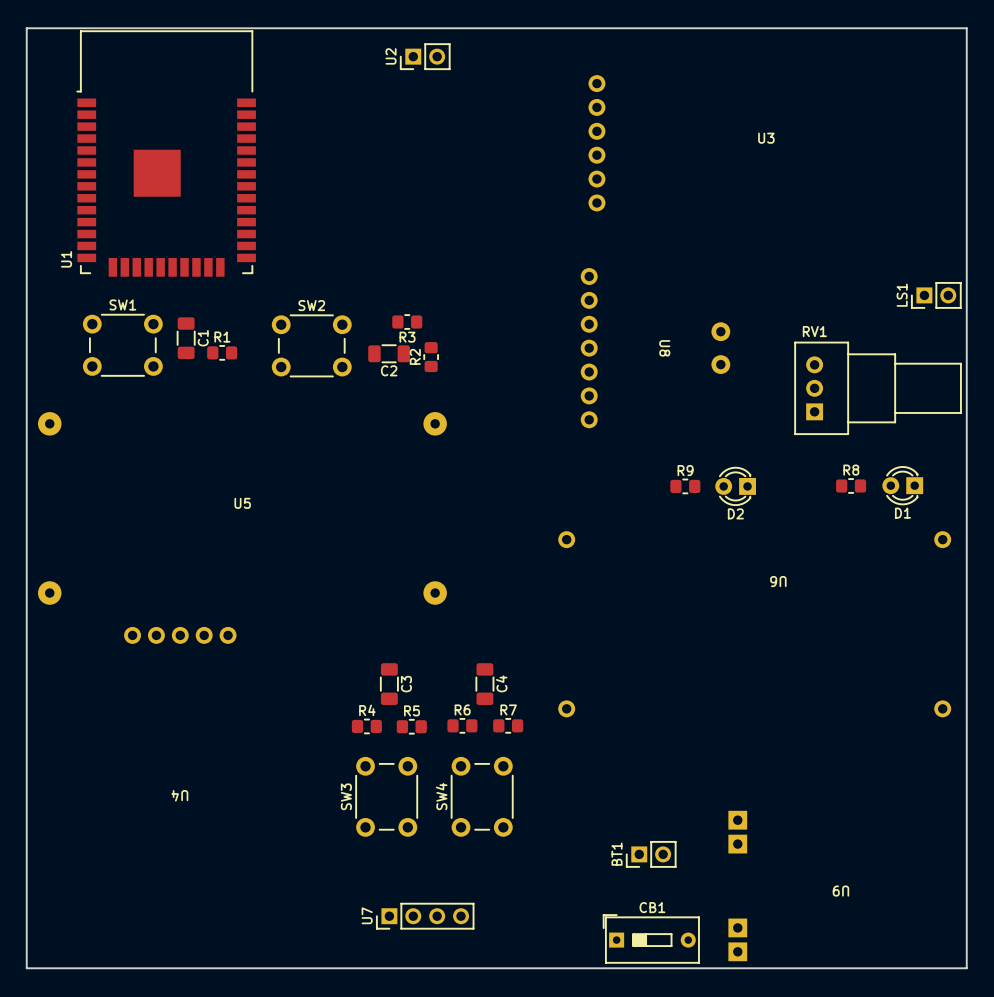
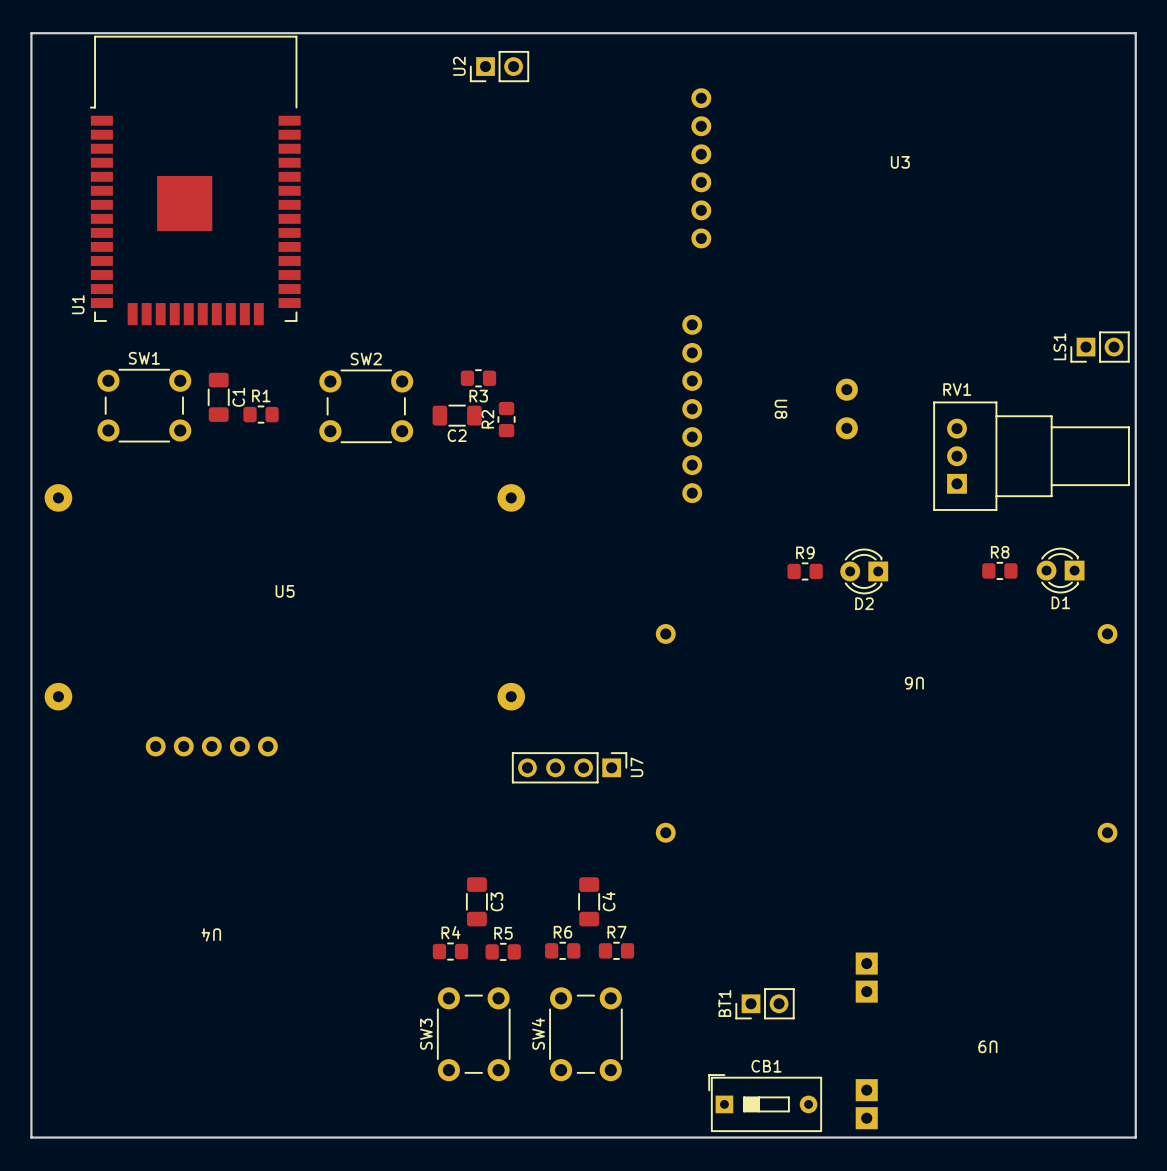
C3 position: (389, 684) -> (476, 901)
C4 position: (484, 684) -> (589, 901)
R6 position: (462, 725) -> (562, 950)
R7 position: (508, 725) -> (616, 950)
R4 position: (366, 726) -> (450, 951)
R5 position: (411, 726) -> (503, 951)
SW3 position: (386, 796) -> (473, 1034)
SW4 position: (482, 796) -> (585, 1034)
U7 rotation: 0° (425, 916) -> 180° (569, 767)
U7 position: (425, 916) -> (569, 767)

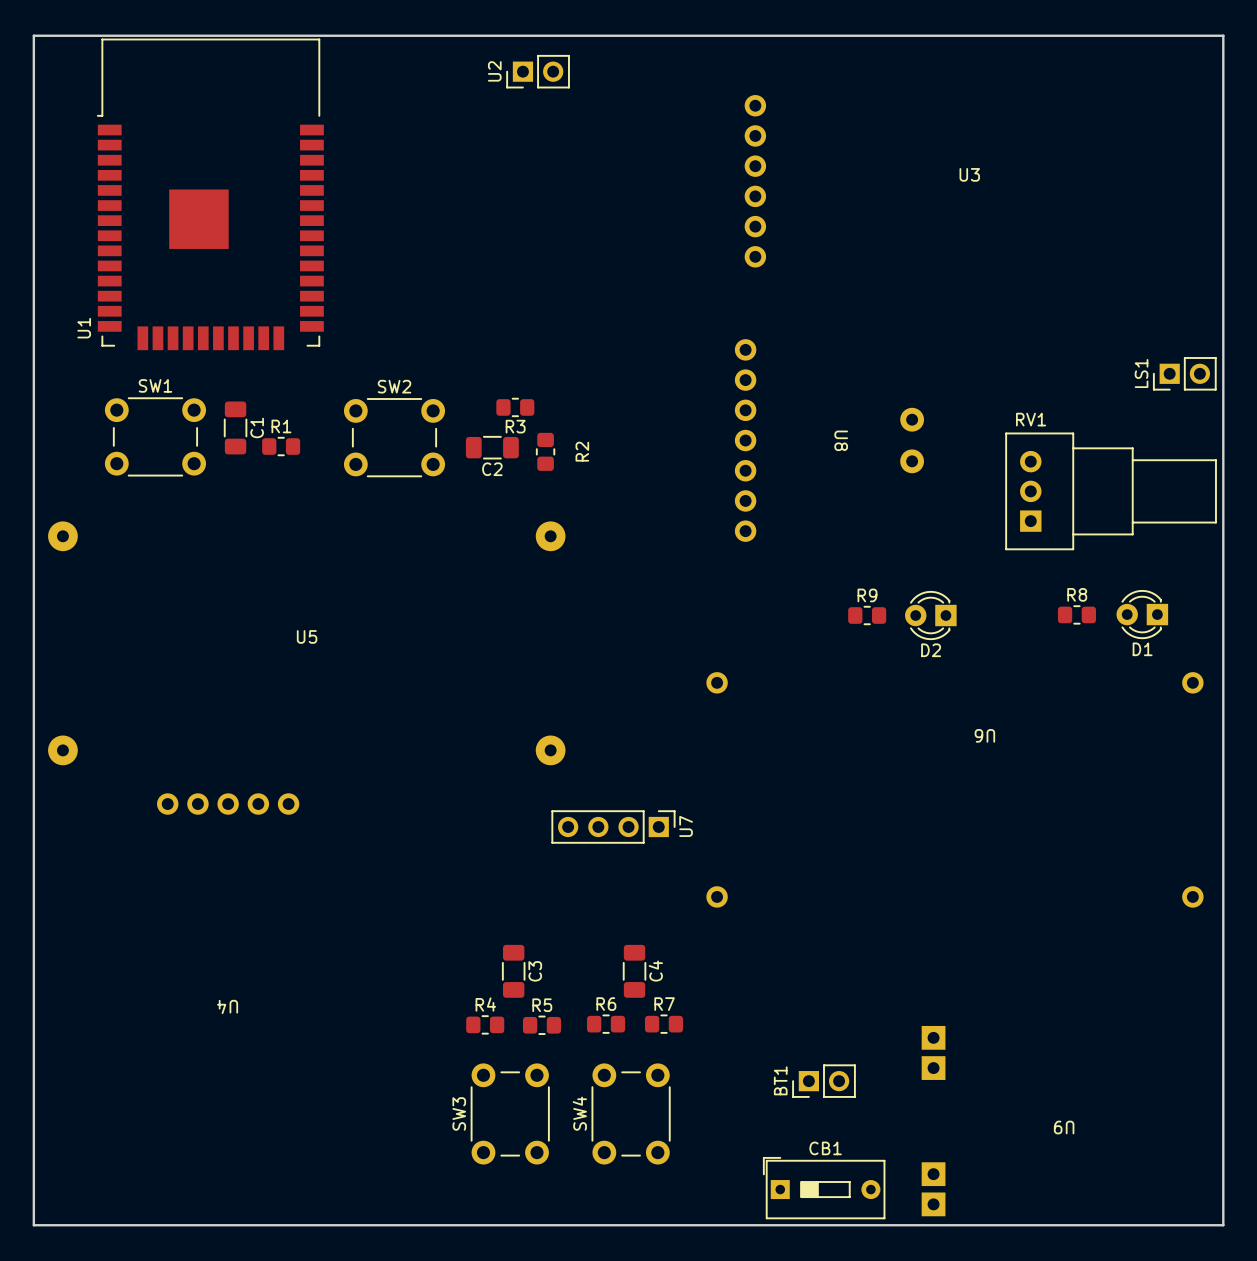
R2 name position: R2 (487, 419) -> R2 (582, 451)

